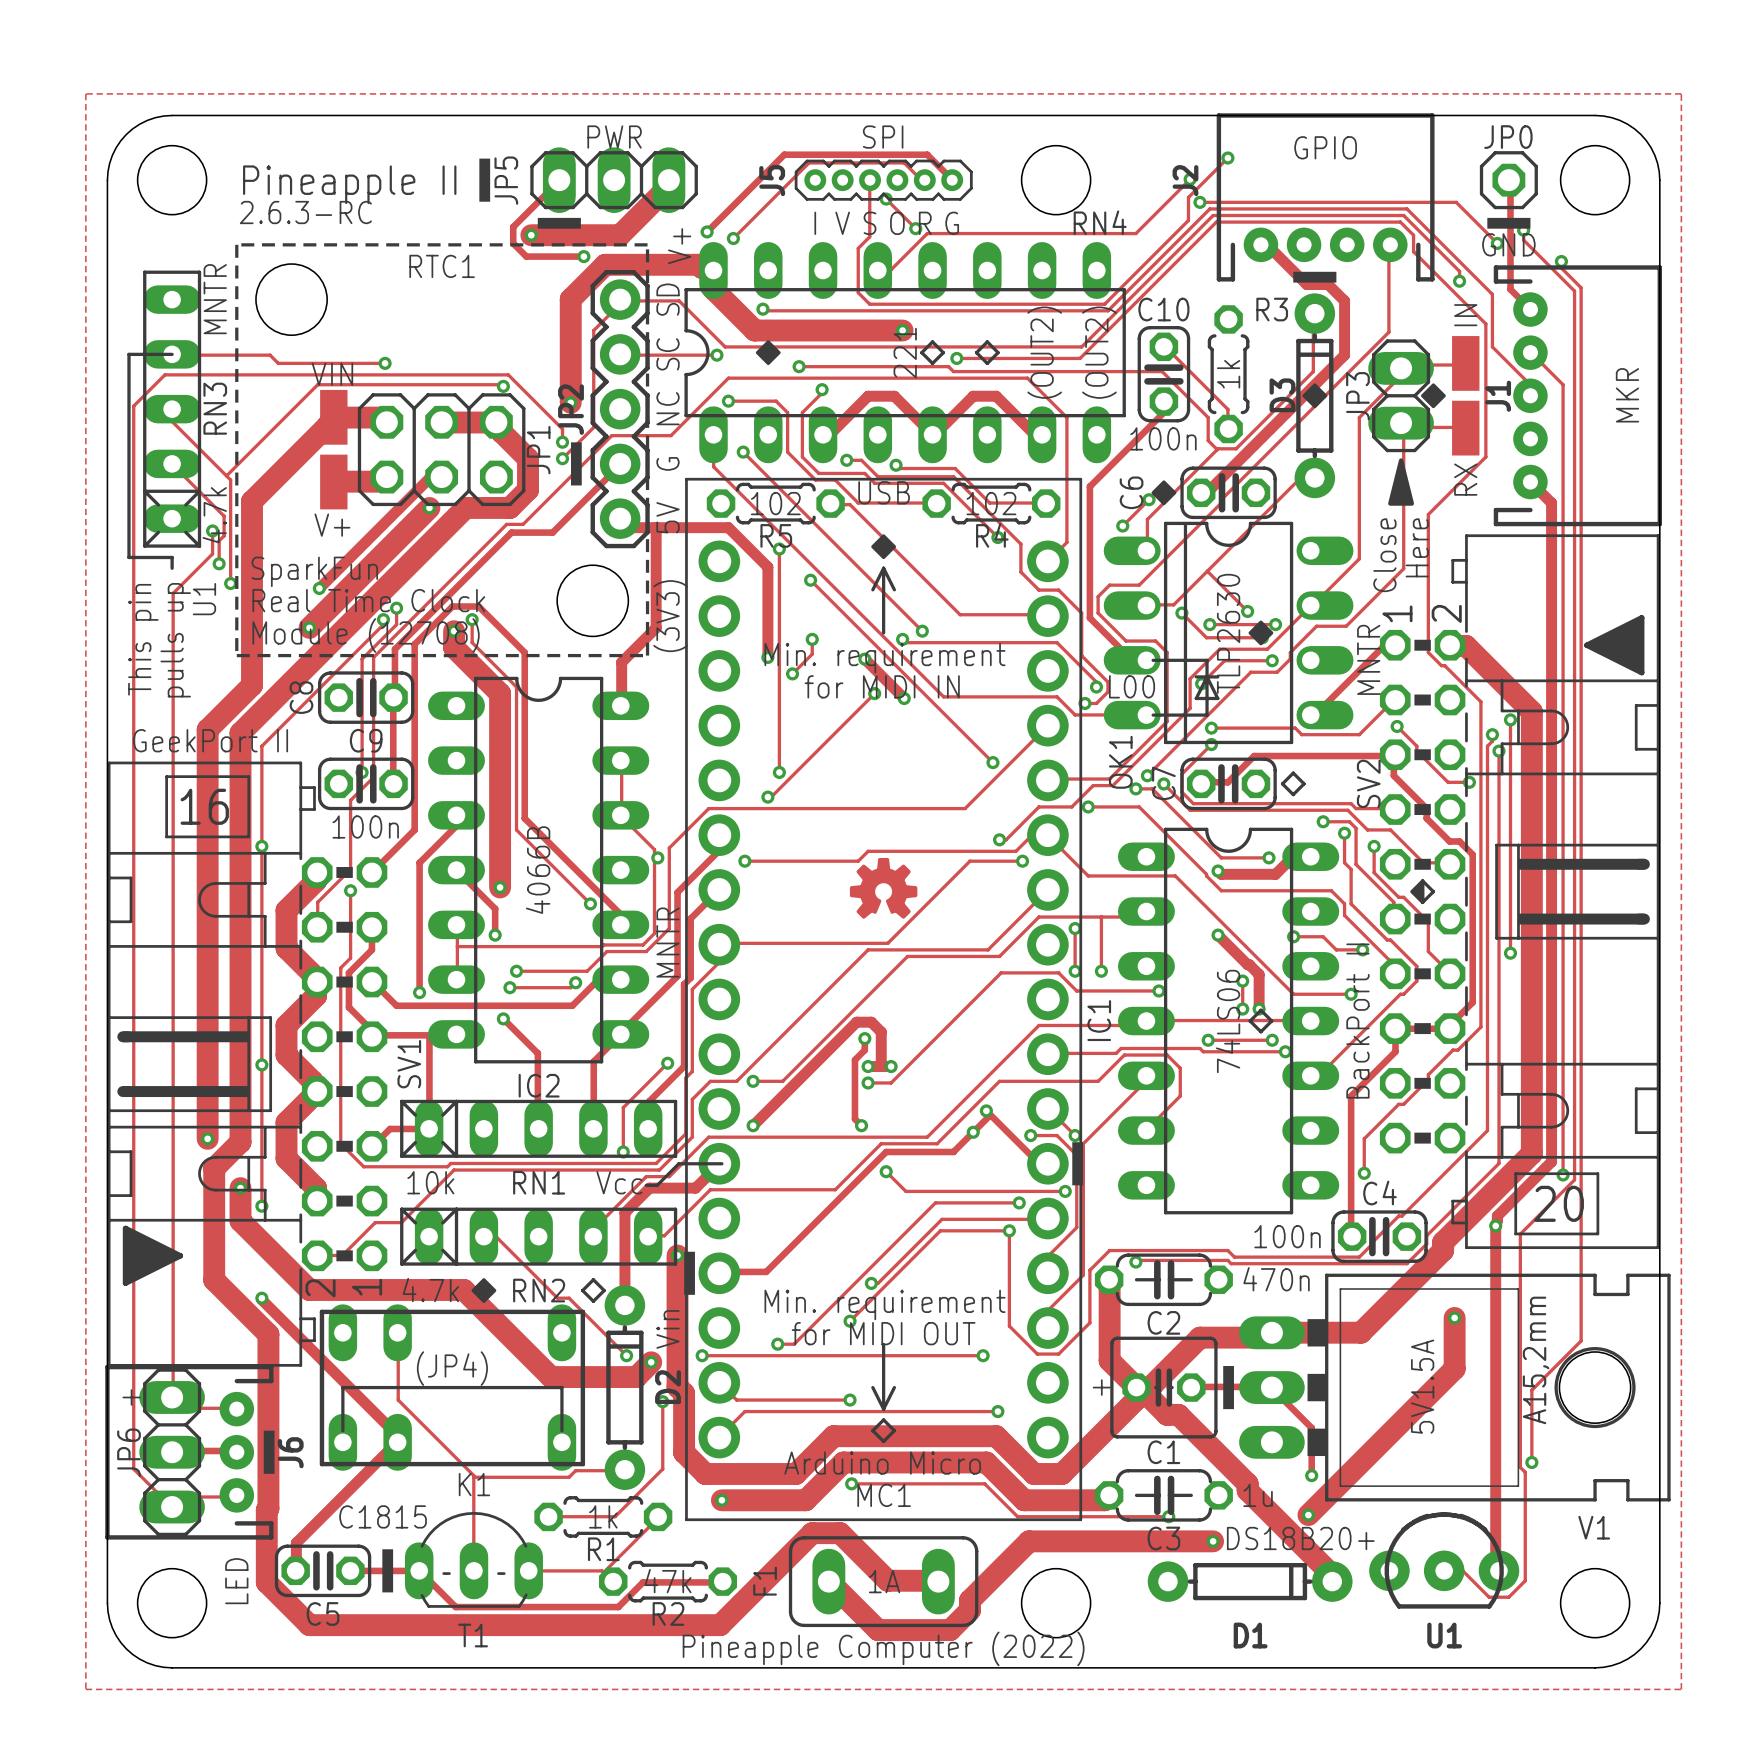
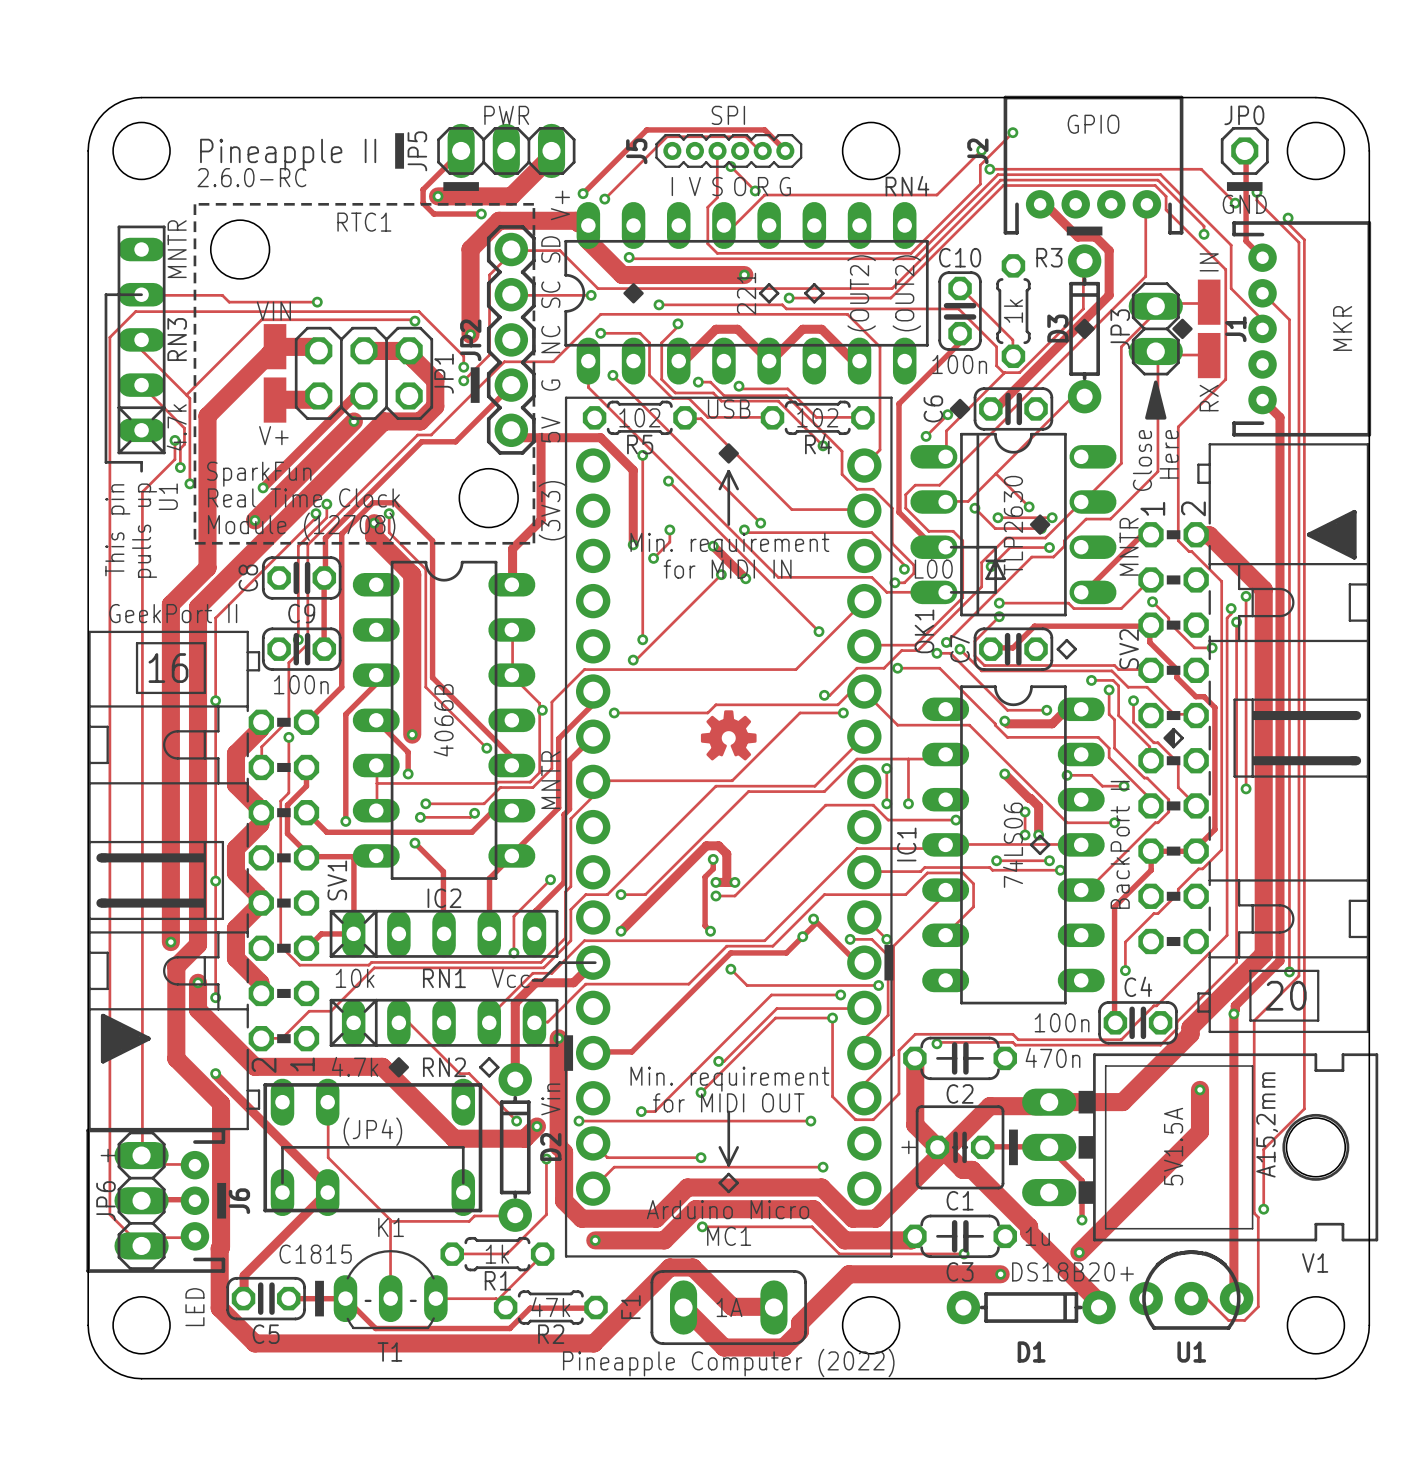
zone outline: (85, 93) (1681, 93) (1681, 1689) (85, 1689) (85, 93) -> none
text: 2.6.3-RC (305, 212) -> 2.6.0-RC (251, 177)

